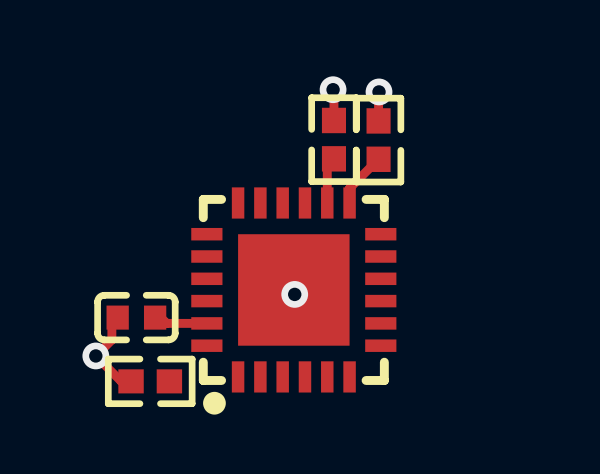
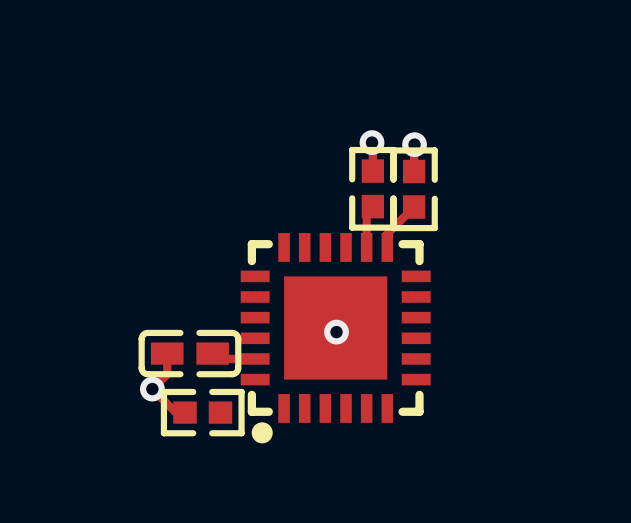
part footprint: [94, 291, 179, 344] -> [138, 329, 242, 378]

